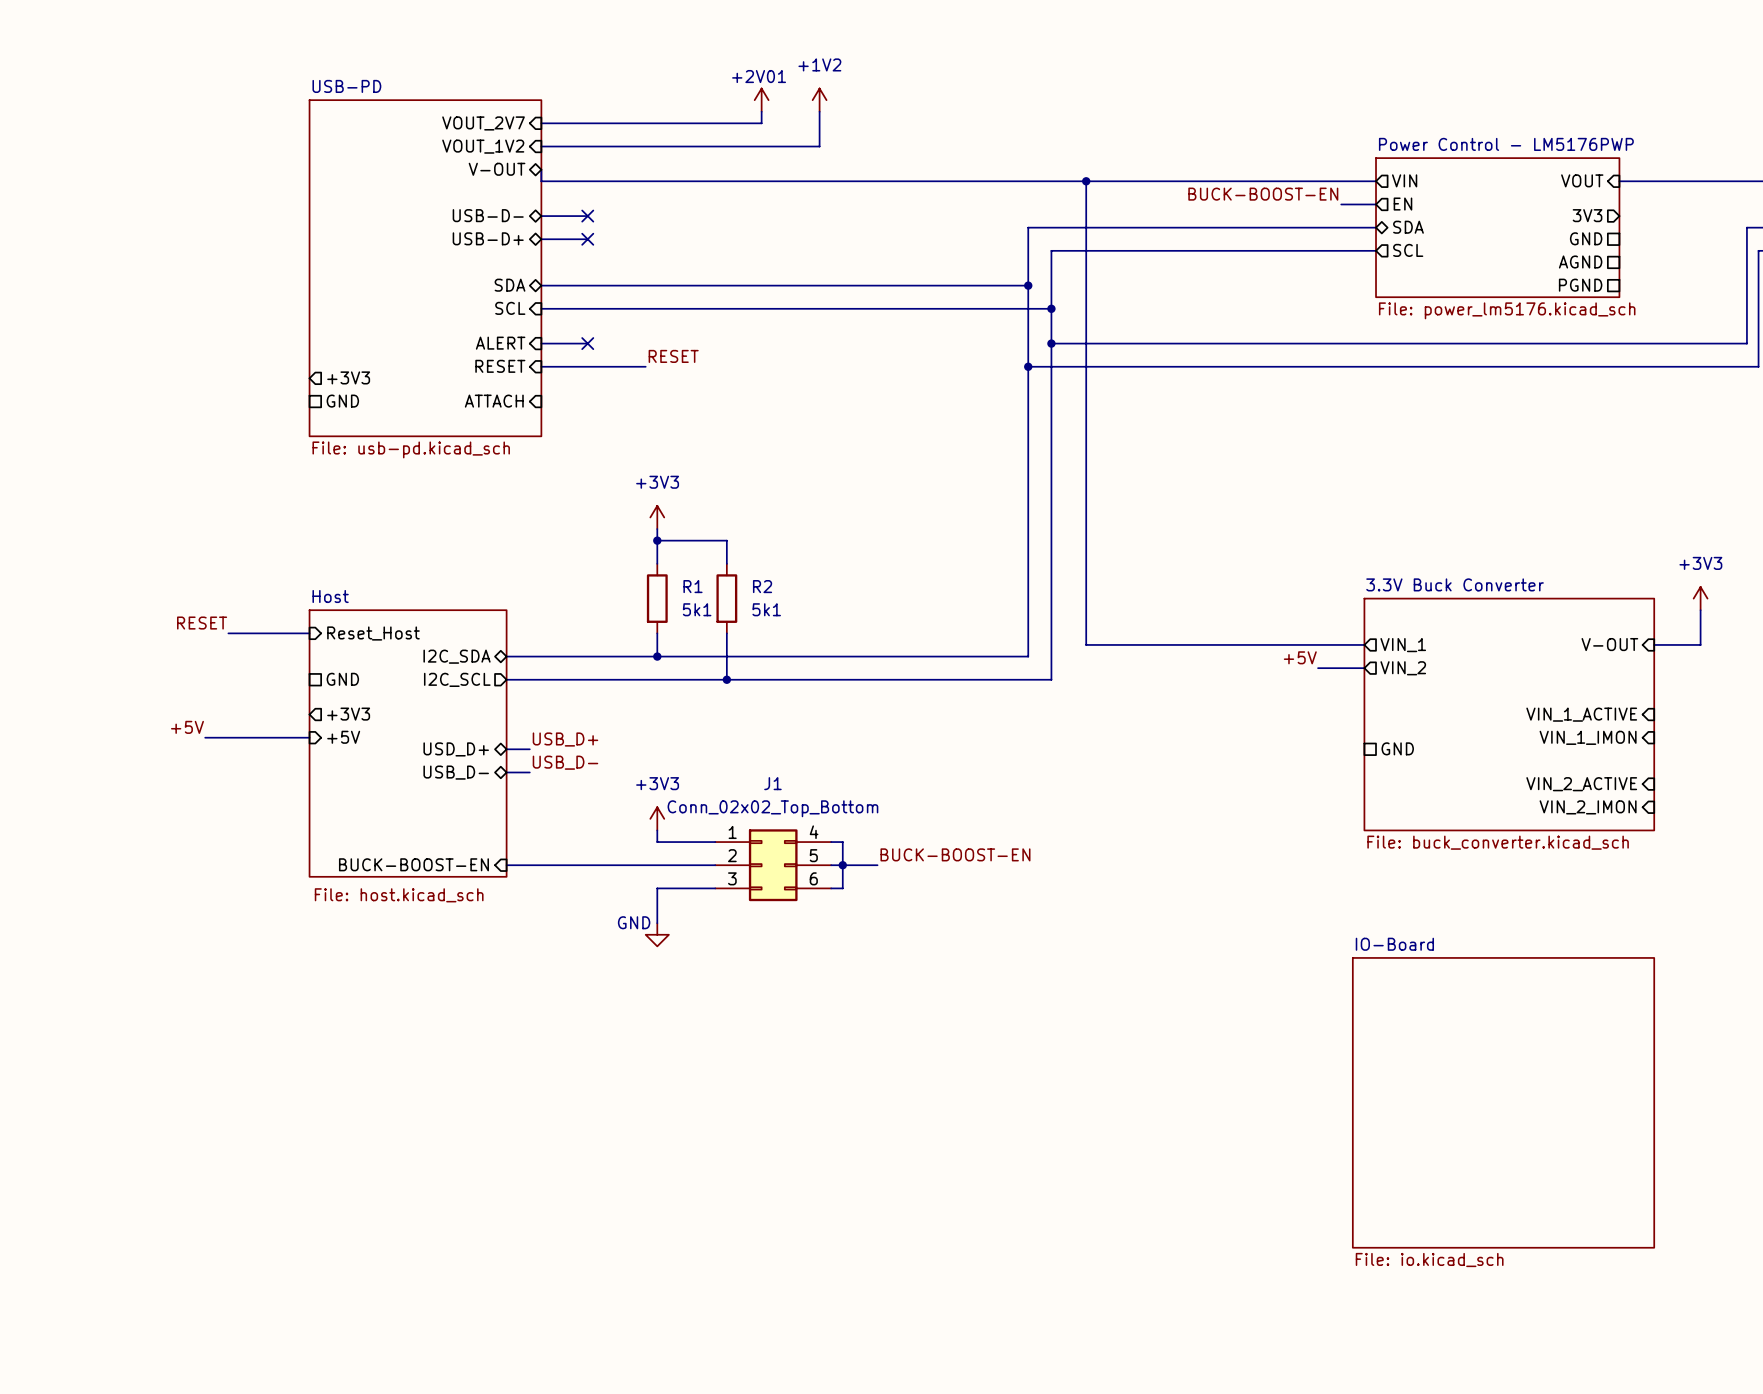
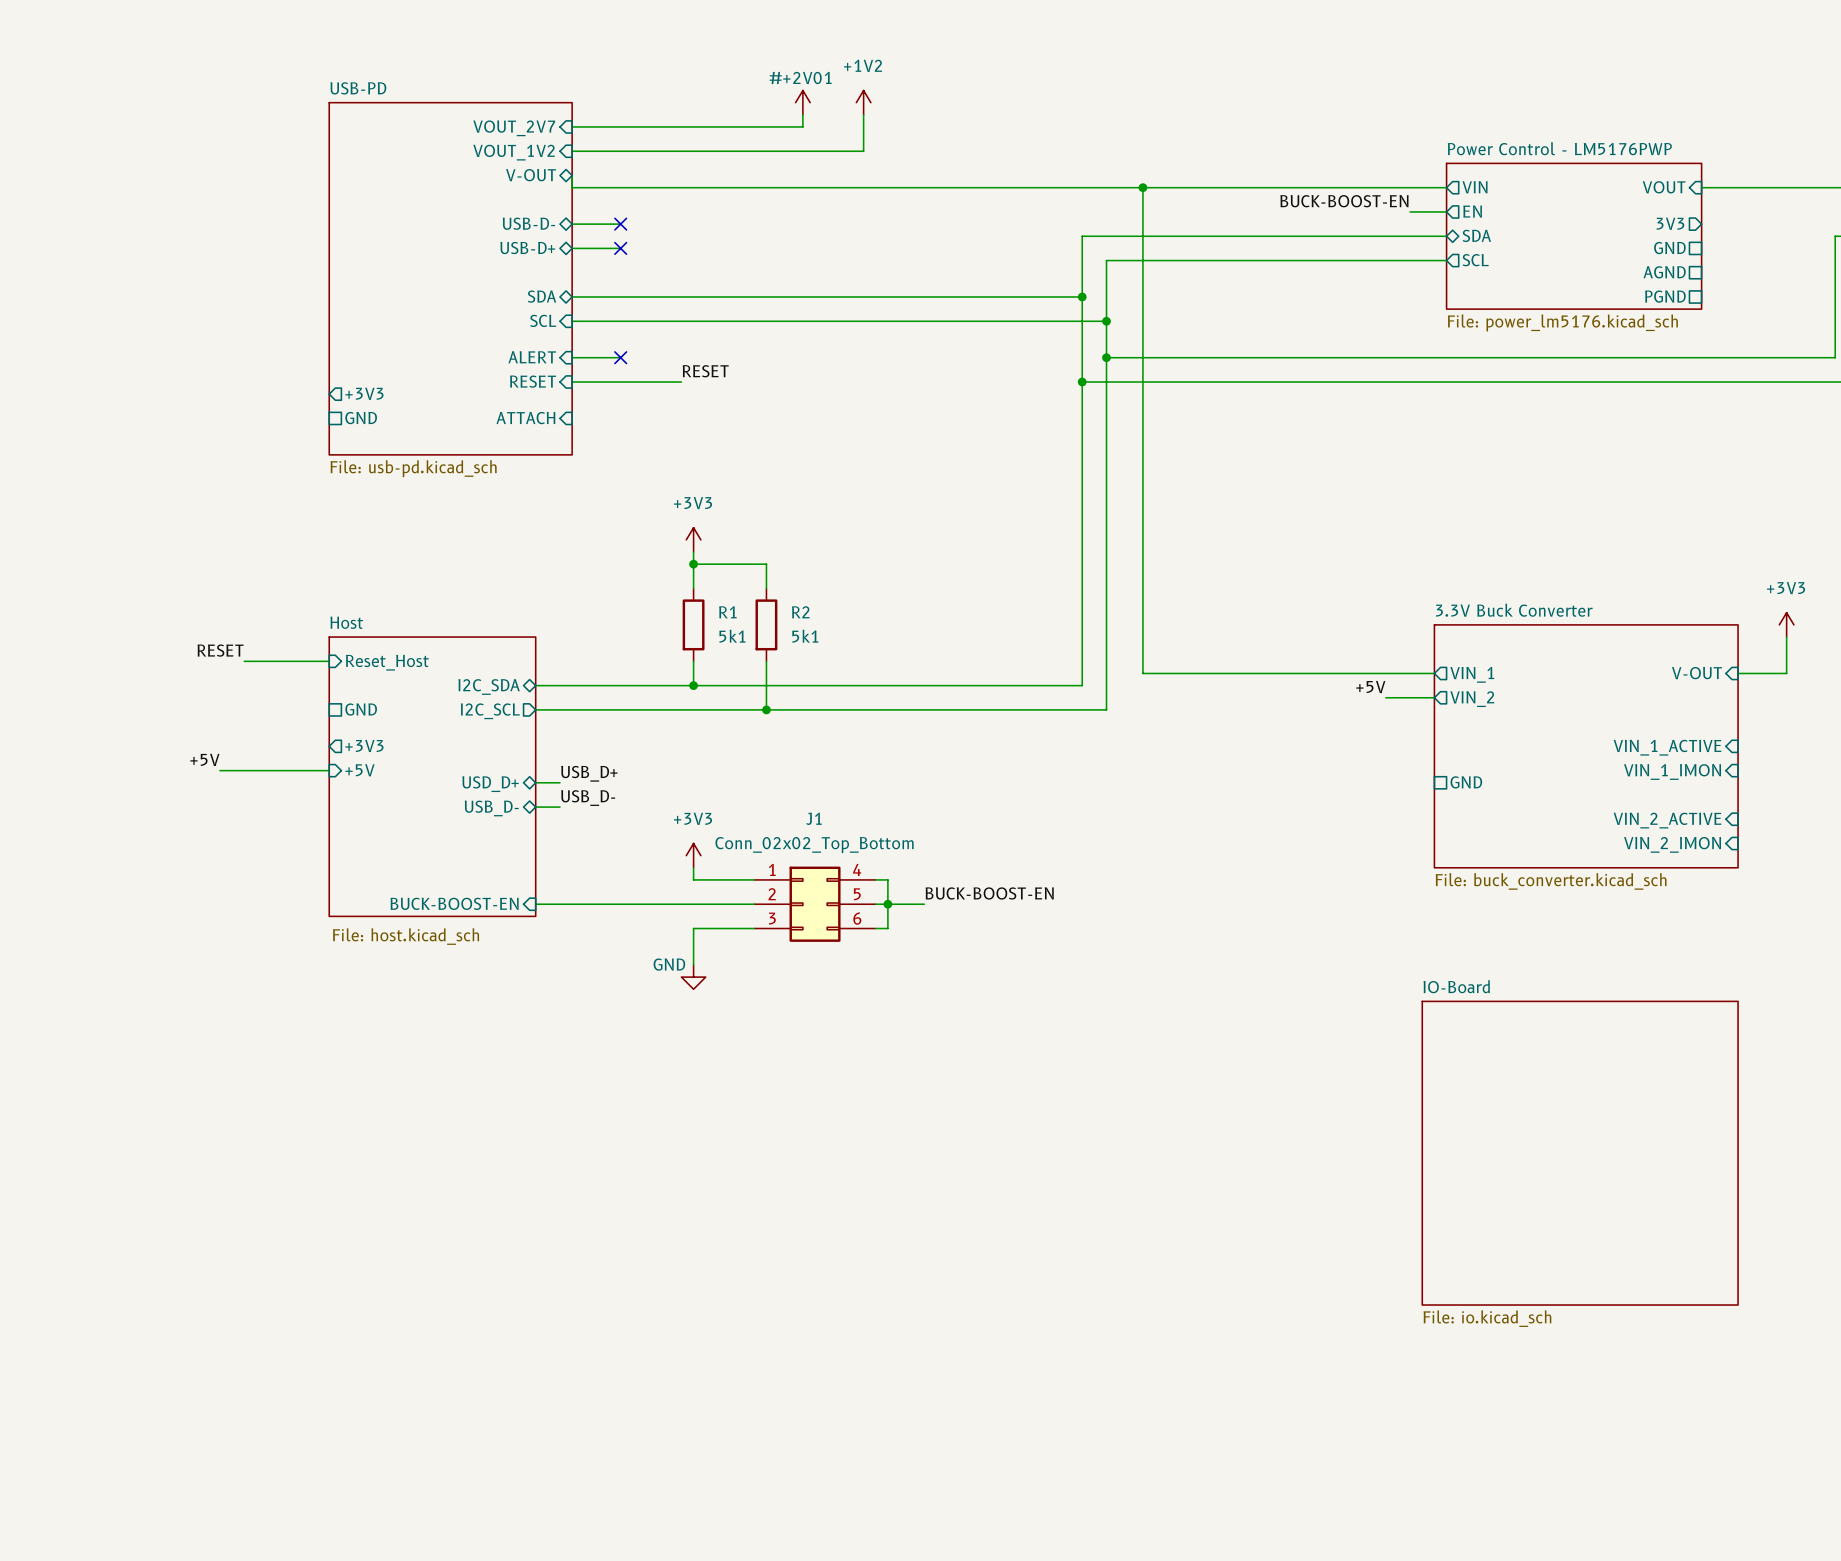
+2V01 name: +2V01 (759, 76) -> #+2V01 (800, 78)

